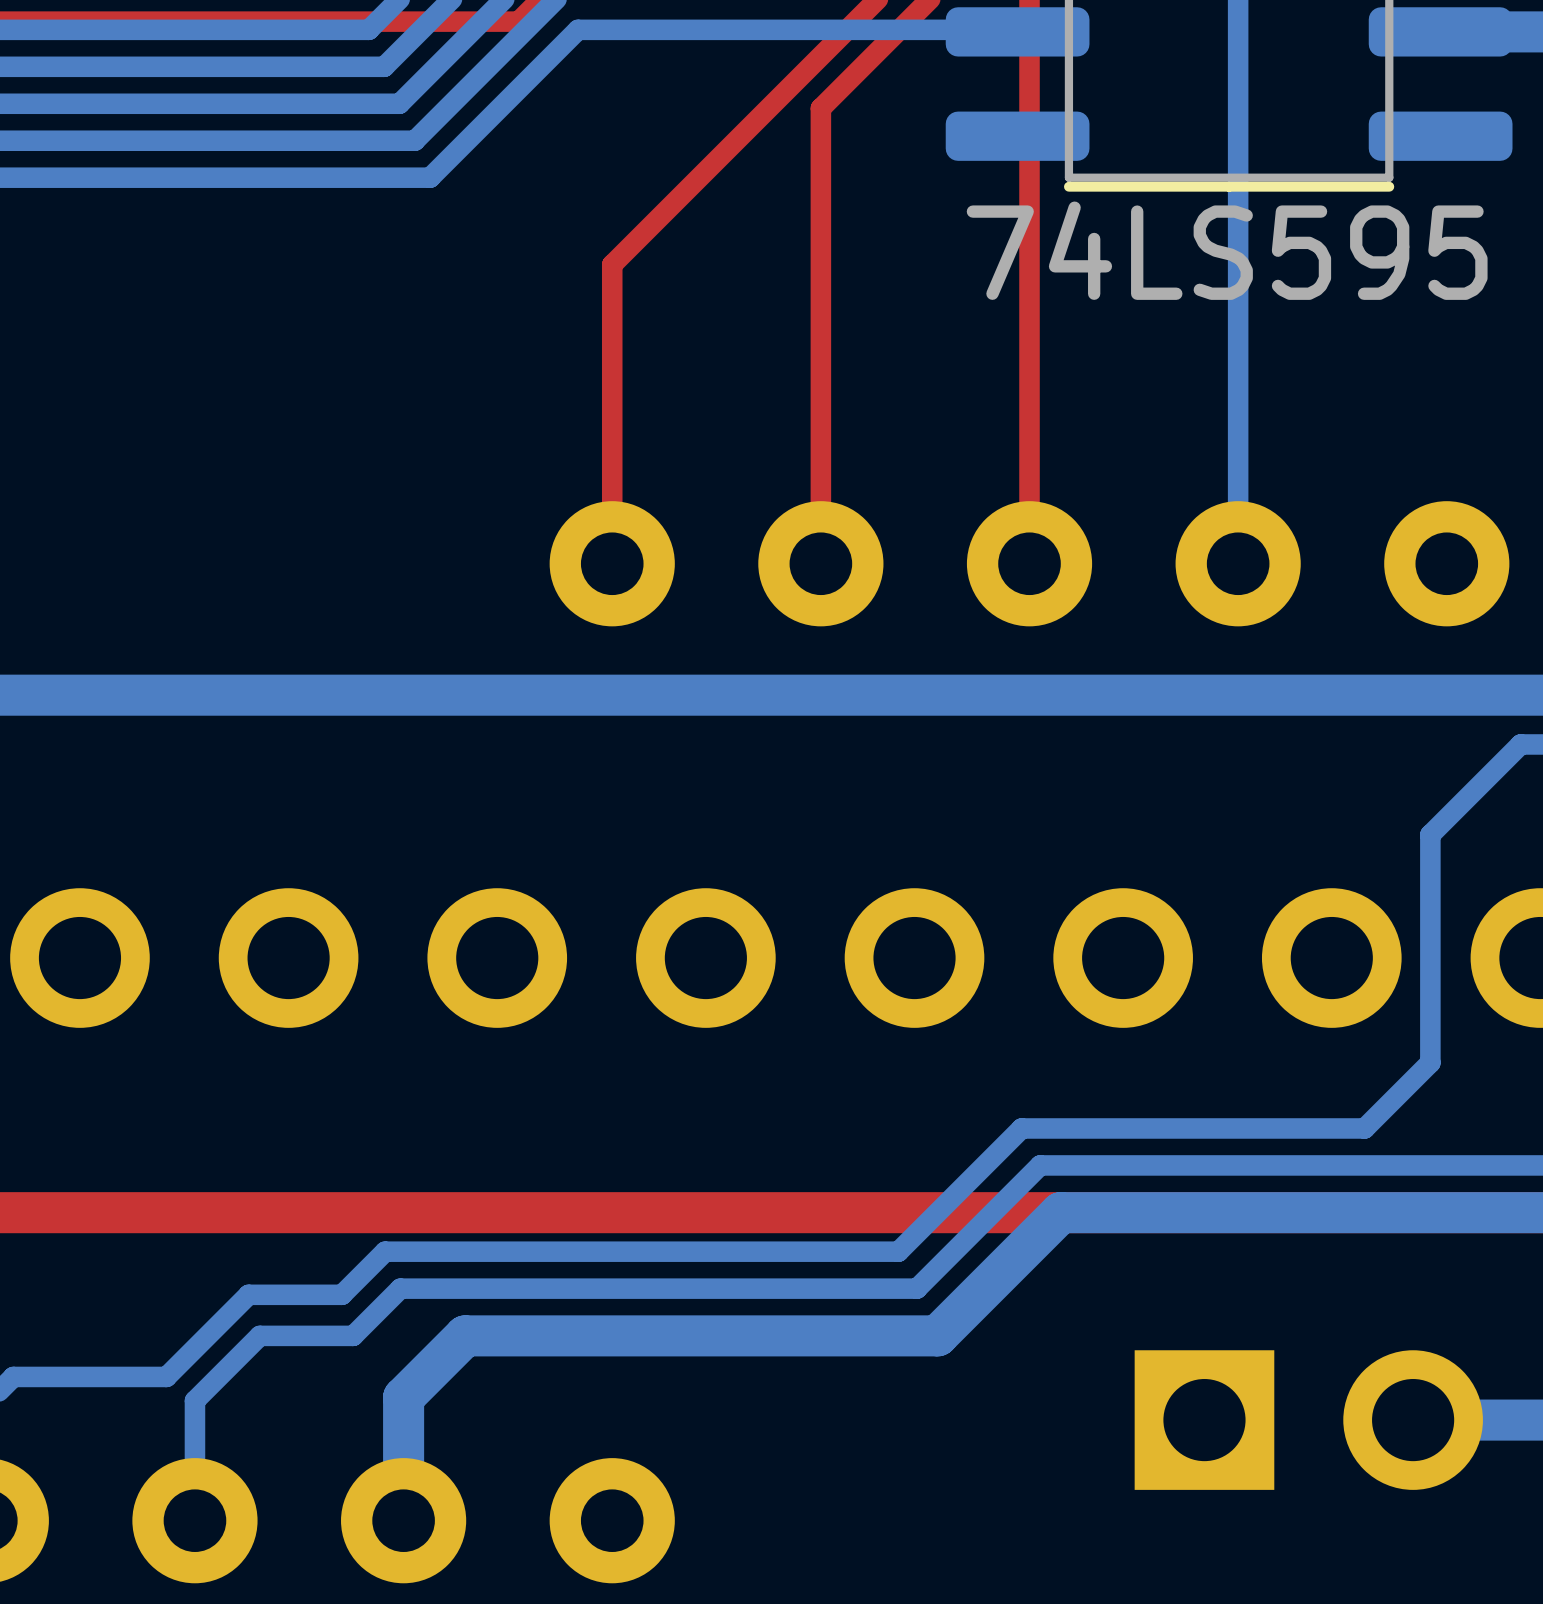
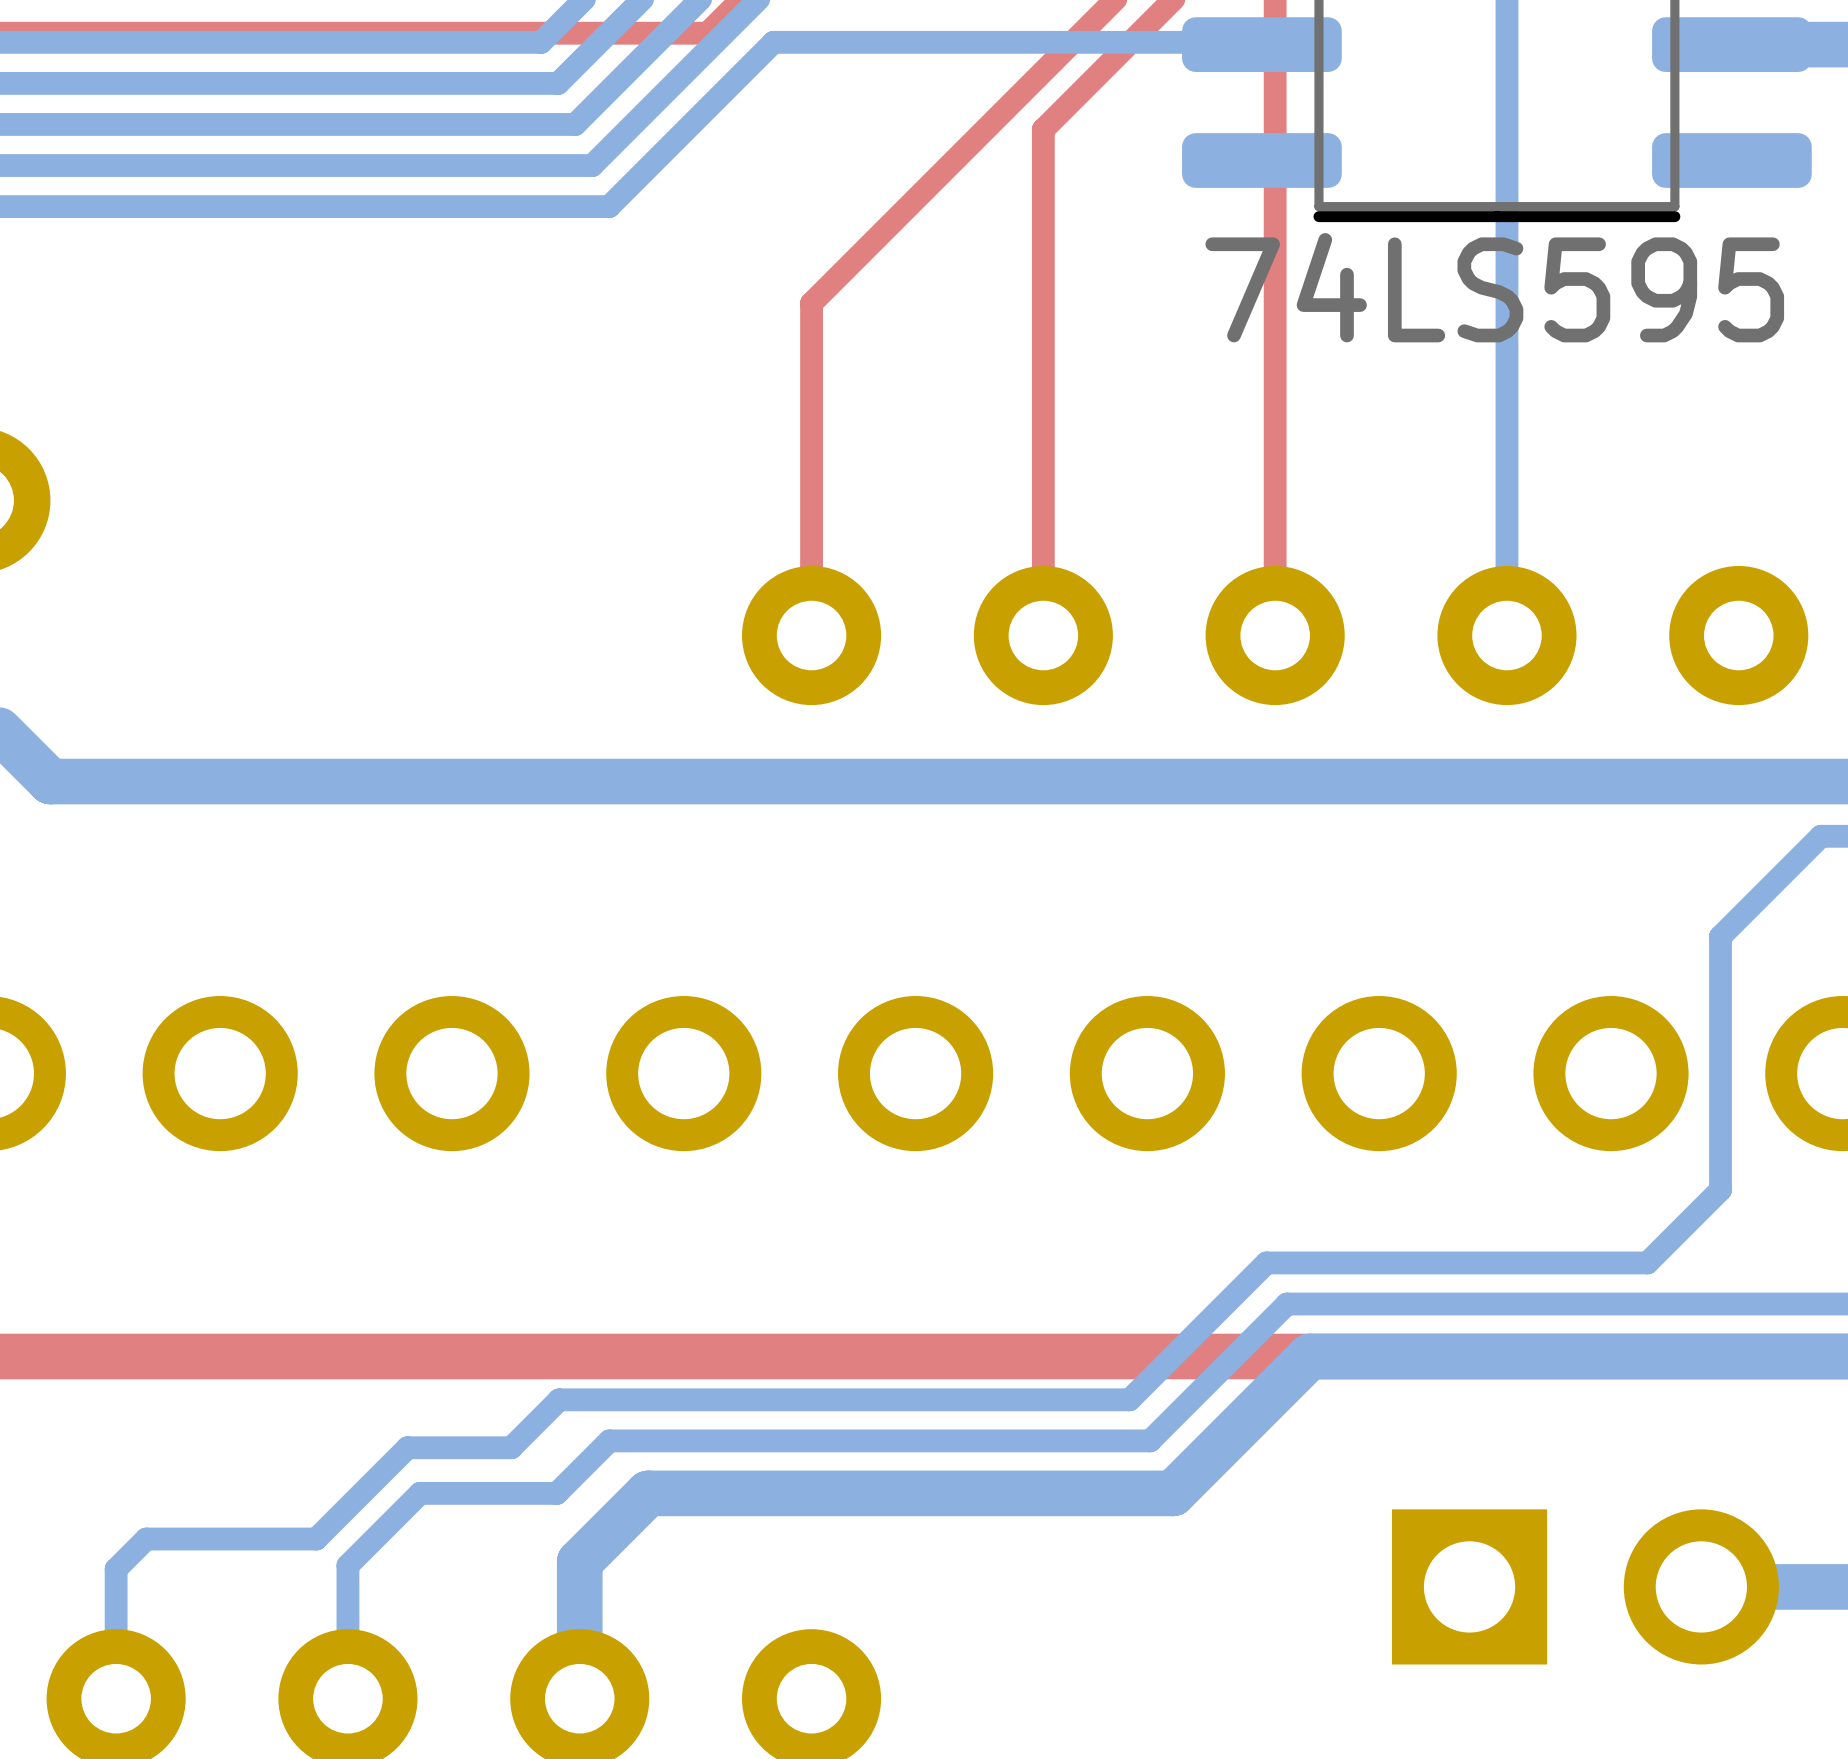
bottom track: (430, 1288) (400, 1288) (353, 1335) -> (609, 1440) (556, 1493) (523, 1493)

